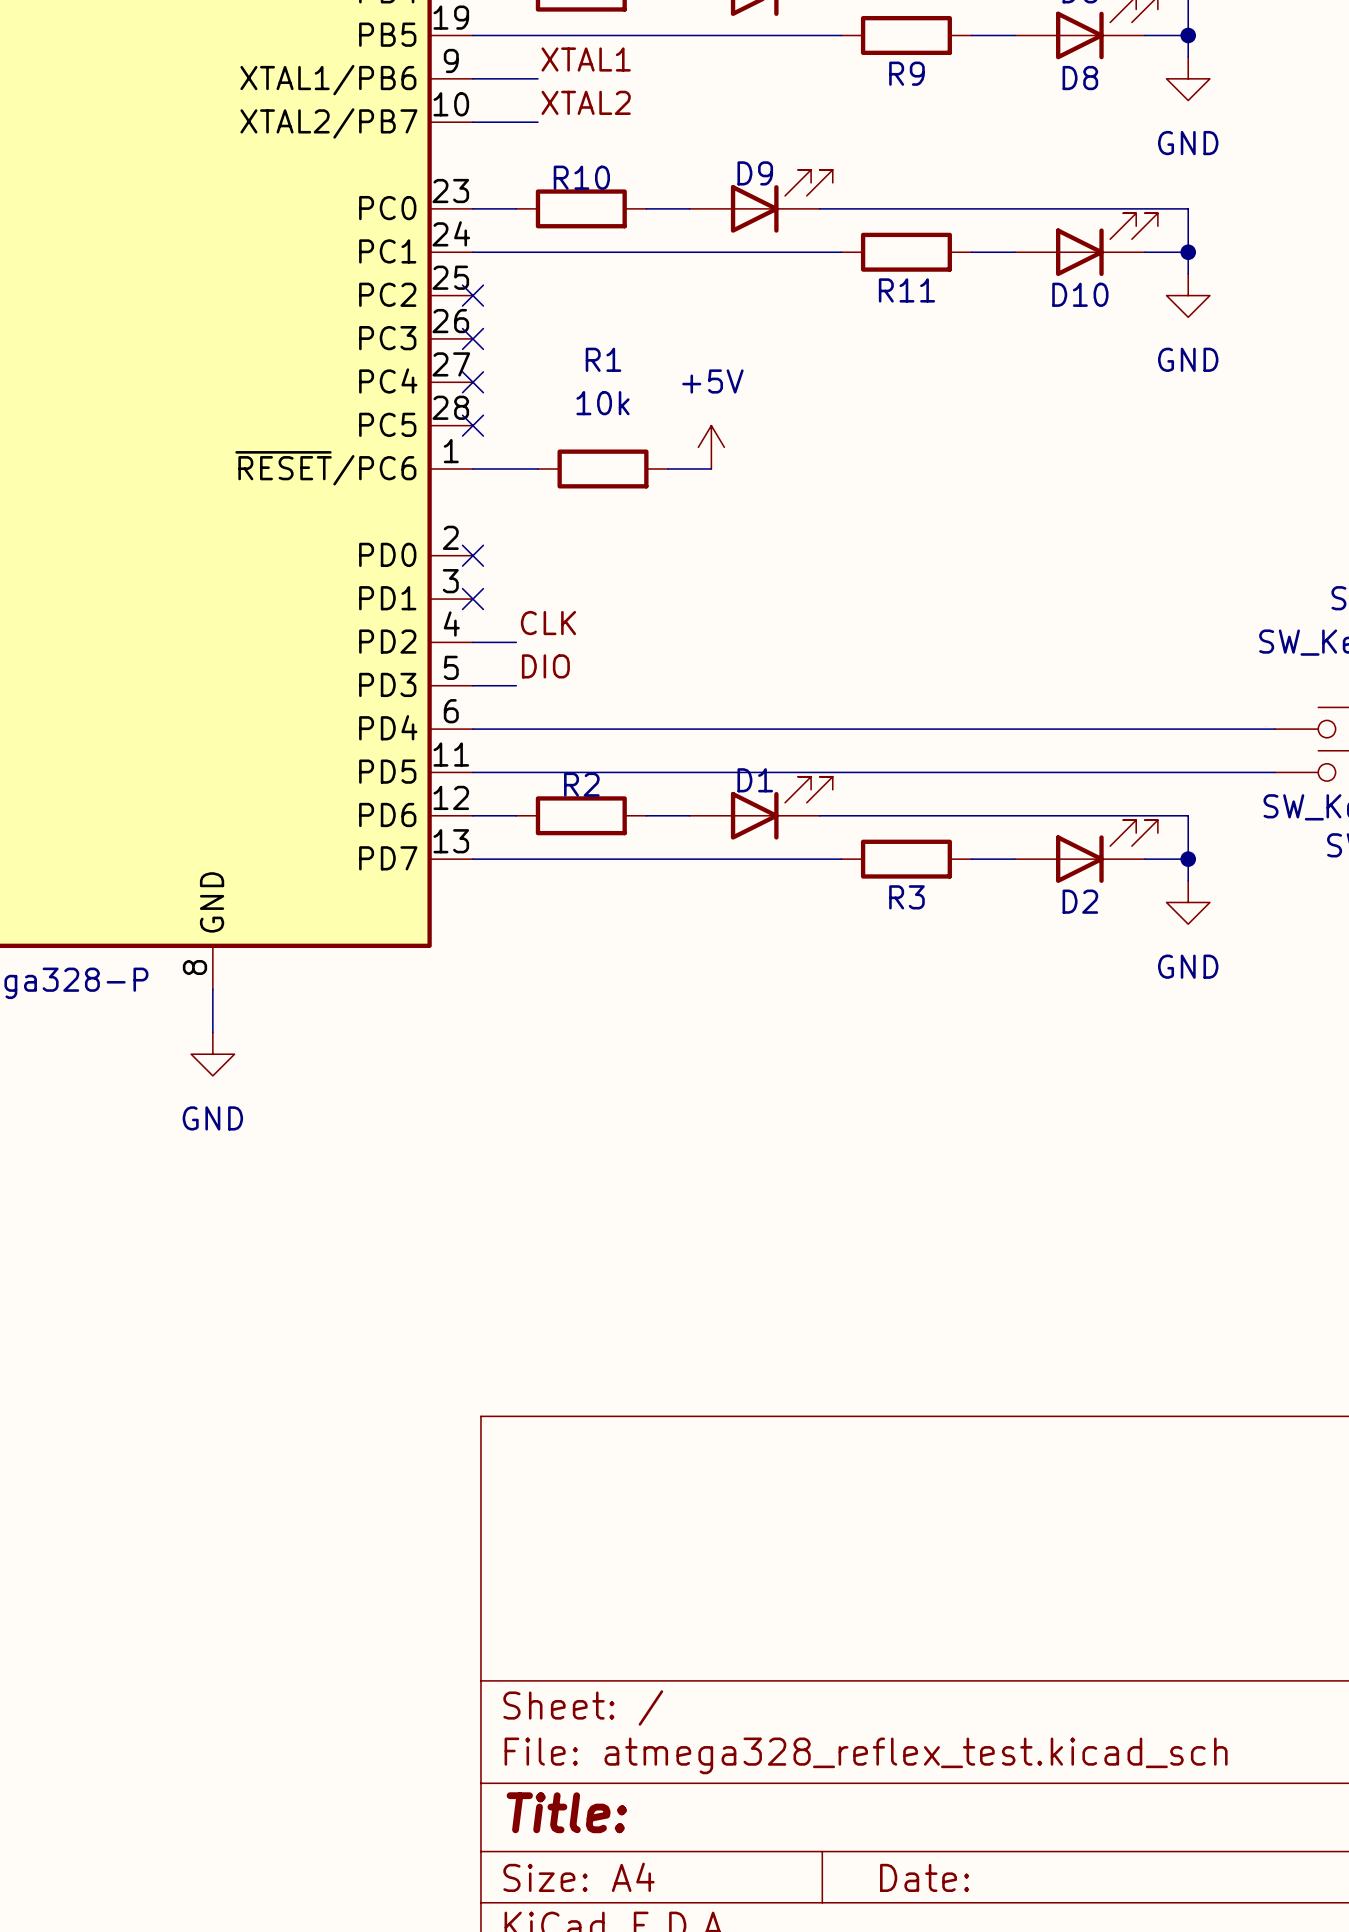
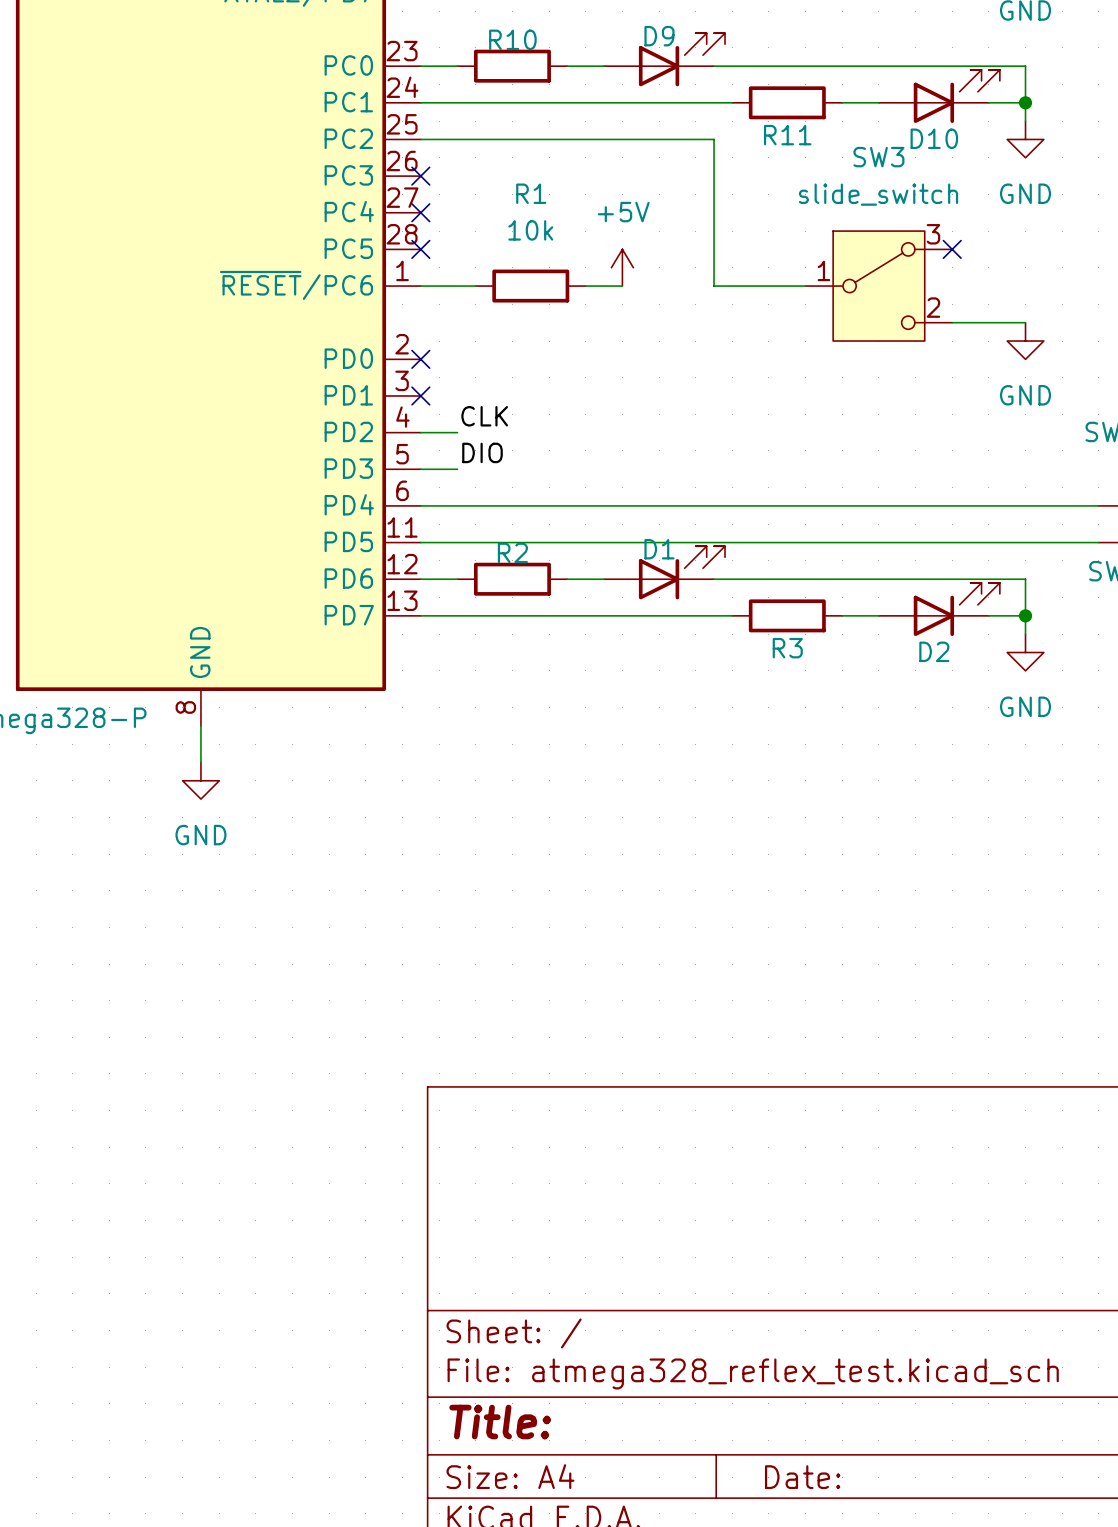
wire: none -> (420, 139) (714, 139) (714, 286) (805, 286)
no-connect mark: (472, 295) -> none
no-connect mark: none -> (952, 249)
SW3: none -> slide_switch (878, 286)
wire: none -> (952, 322) (1025, 322)
power symbol: none -> GND (1025, 341)

